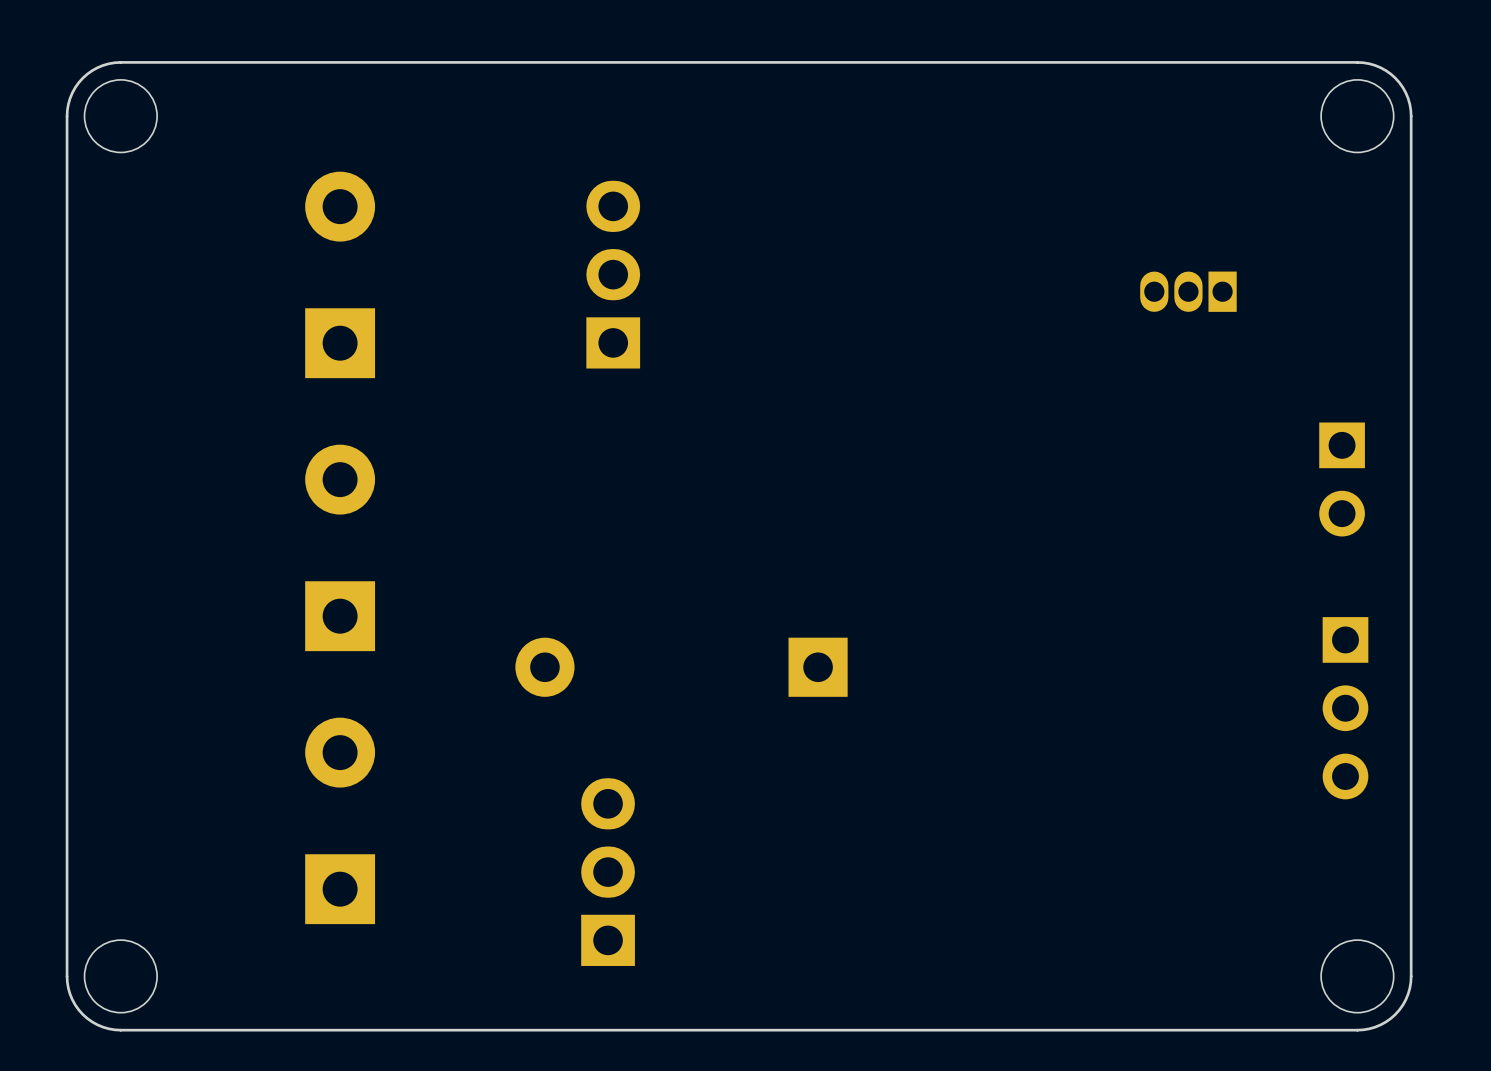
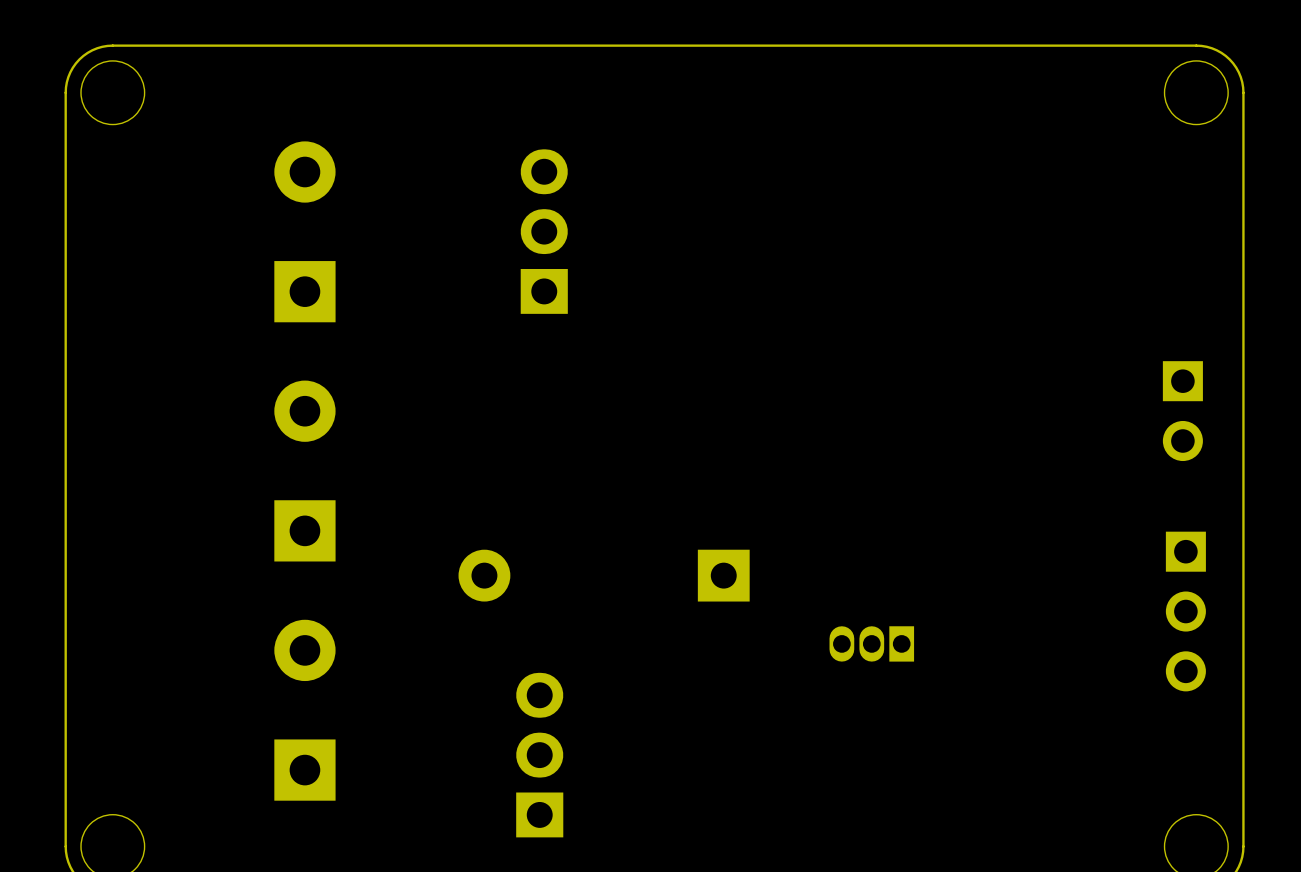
part position: (1188, 291) -> (871, 643)

